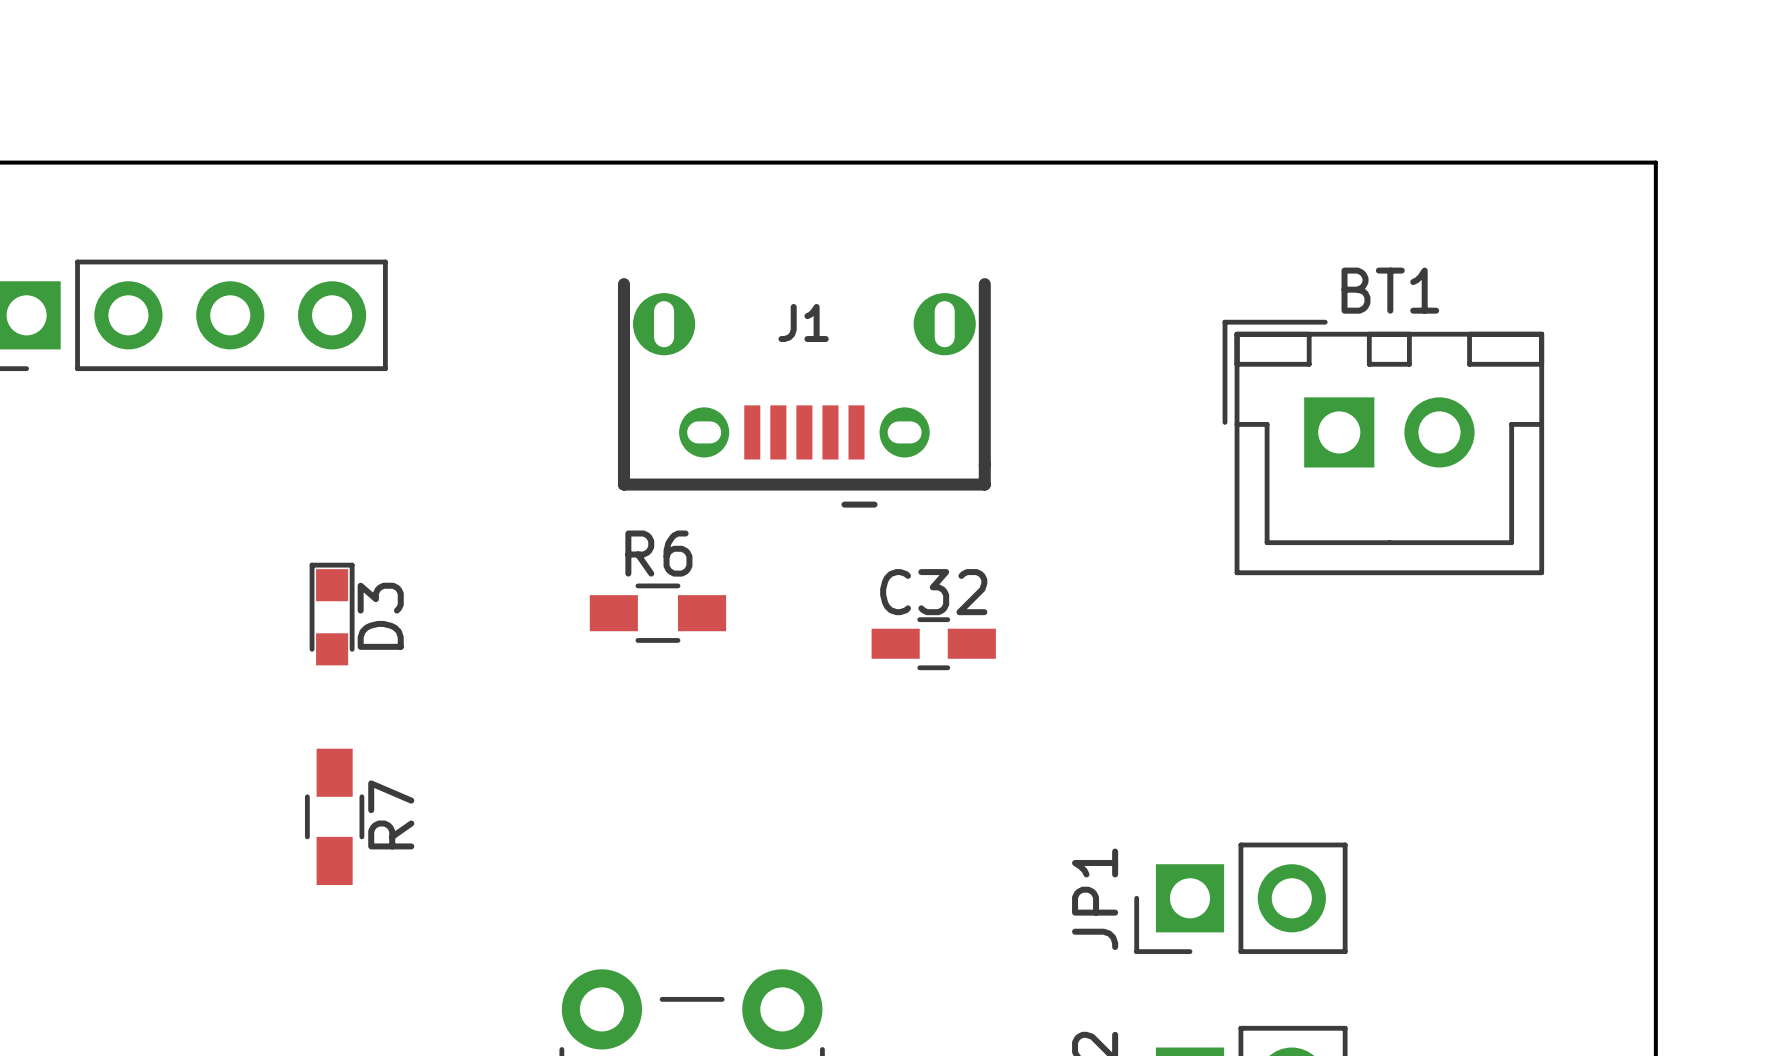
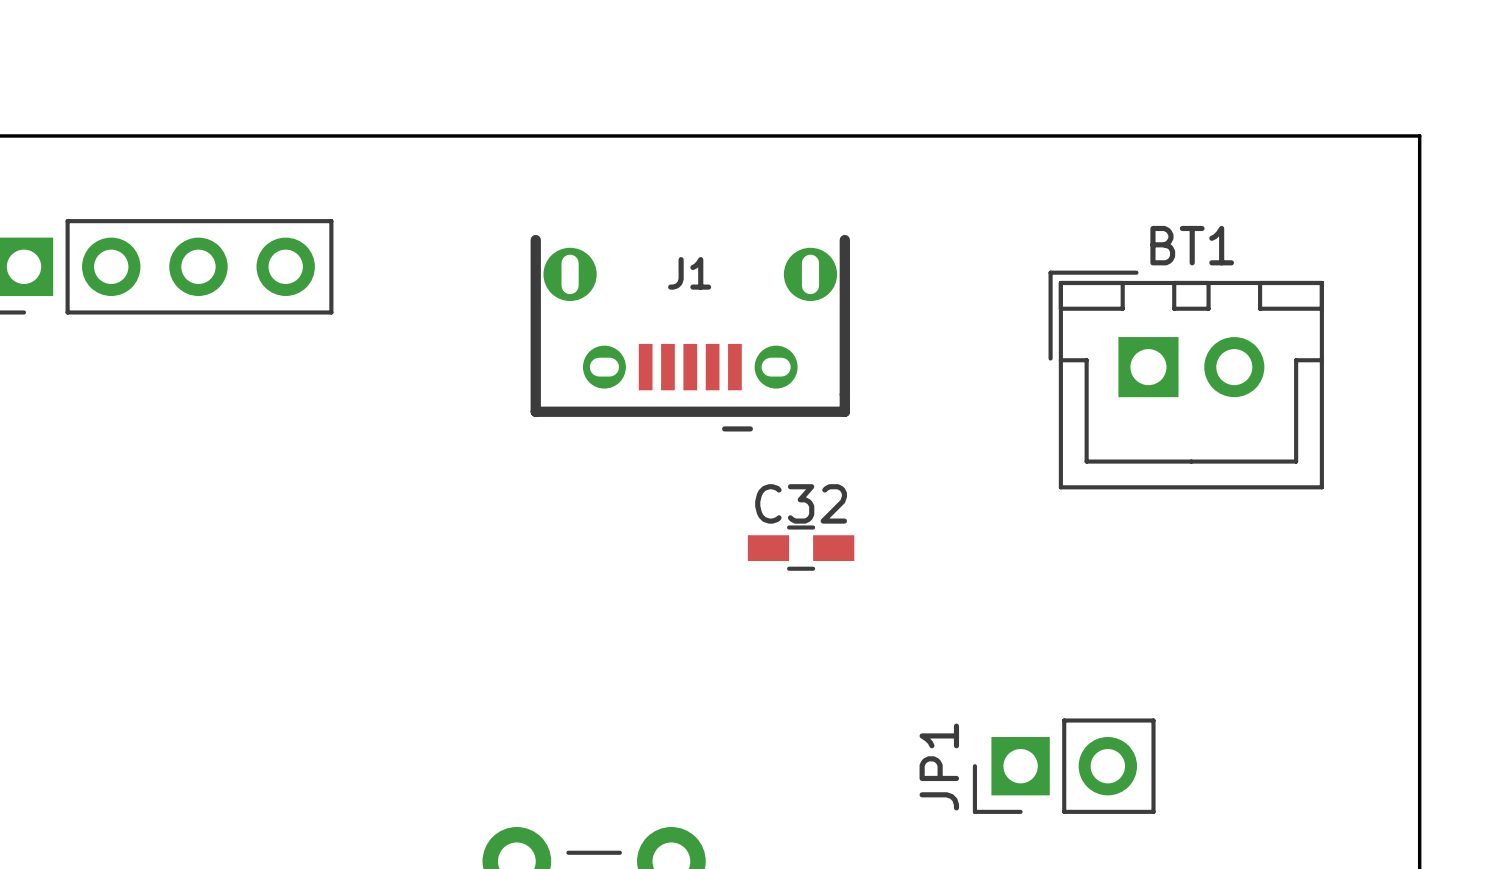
R6: (657, 613) -> none
D3: (332, 614) -> none
R7: (334, 816) -> none

